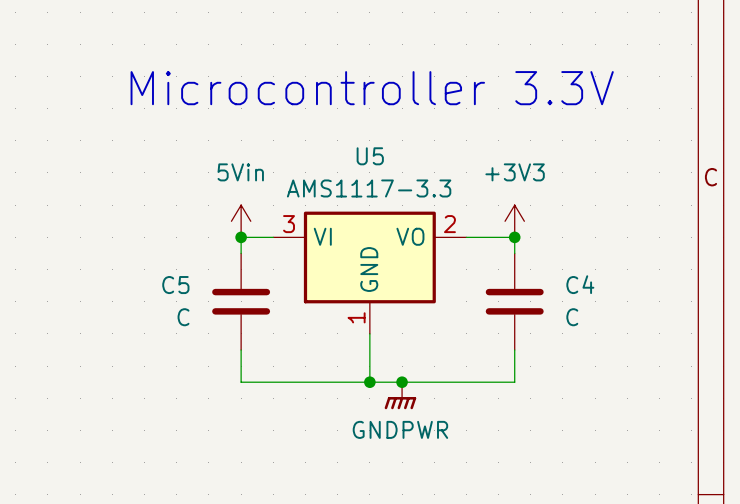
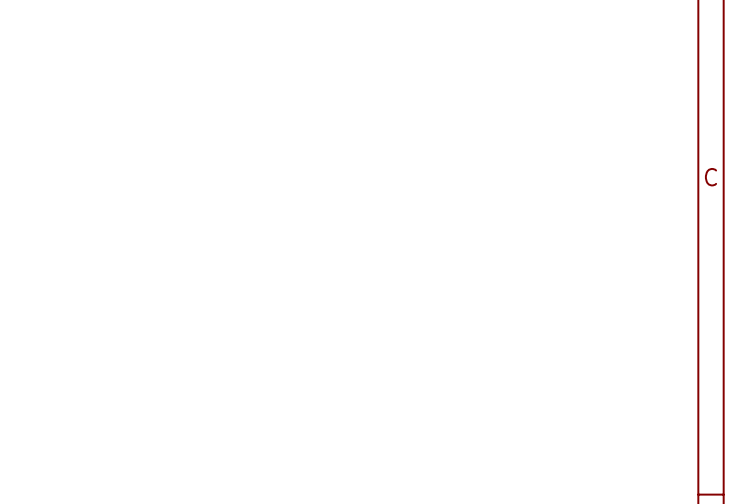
text: Microcontroller 3.3V (372, 88) -> none
power symbol: 5Vin (241, 221) -> none
power symbol: +3V3 (514, 221) -> none
junction: (241, 237) -> none
wire: (273, 237) (241, 237) (241, 253) -> none
wire: (466, 237) (514, 237) (514, 253) -> none
junction: (514, 237) -> none
U5: AMS1117-3.3 (369, 272) -> none
C5: C (241, 301) -> none
C4: C (514, 301) -> none
wire: (369, 333) (369, 382) -> none
wire: (241, 350) (241, 382) (514, 382) (514, 350) -> none
junction: (369, 382) -> none
junction: (402, 382) -> none
power symbol: GNDPWR (400, 395) -> none

